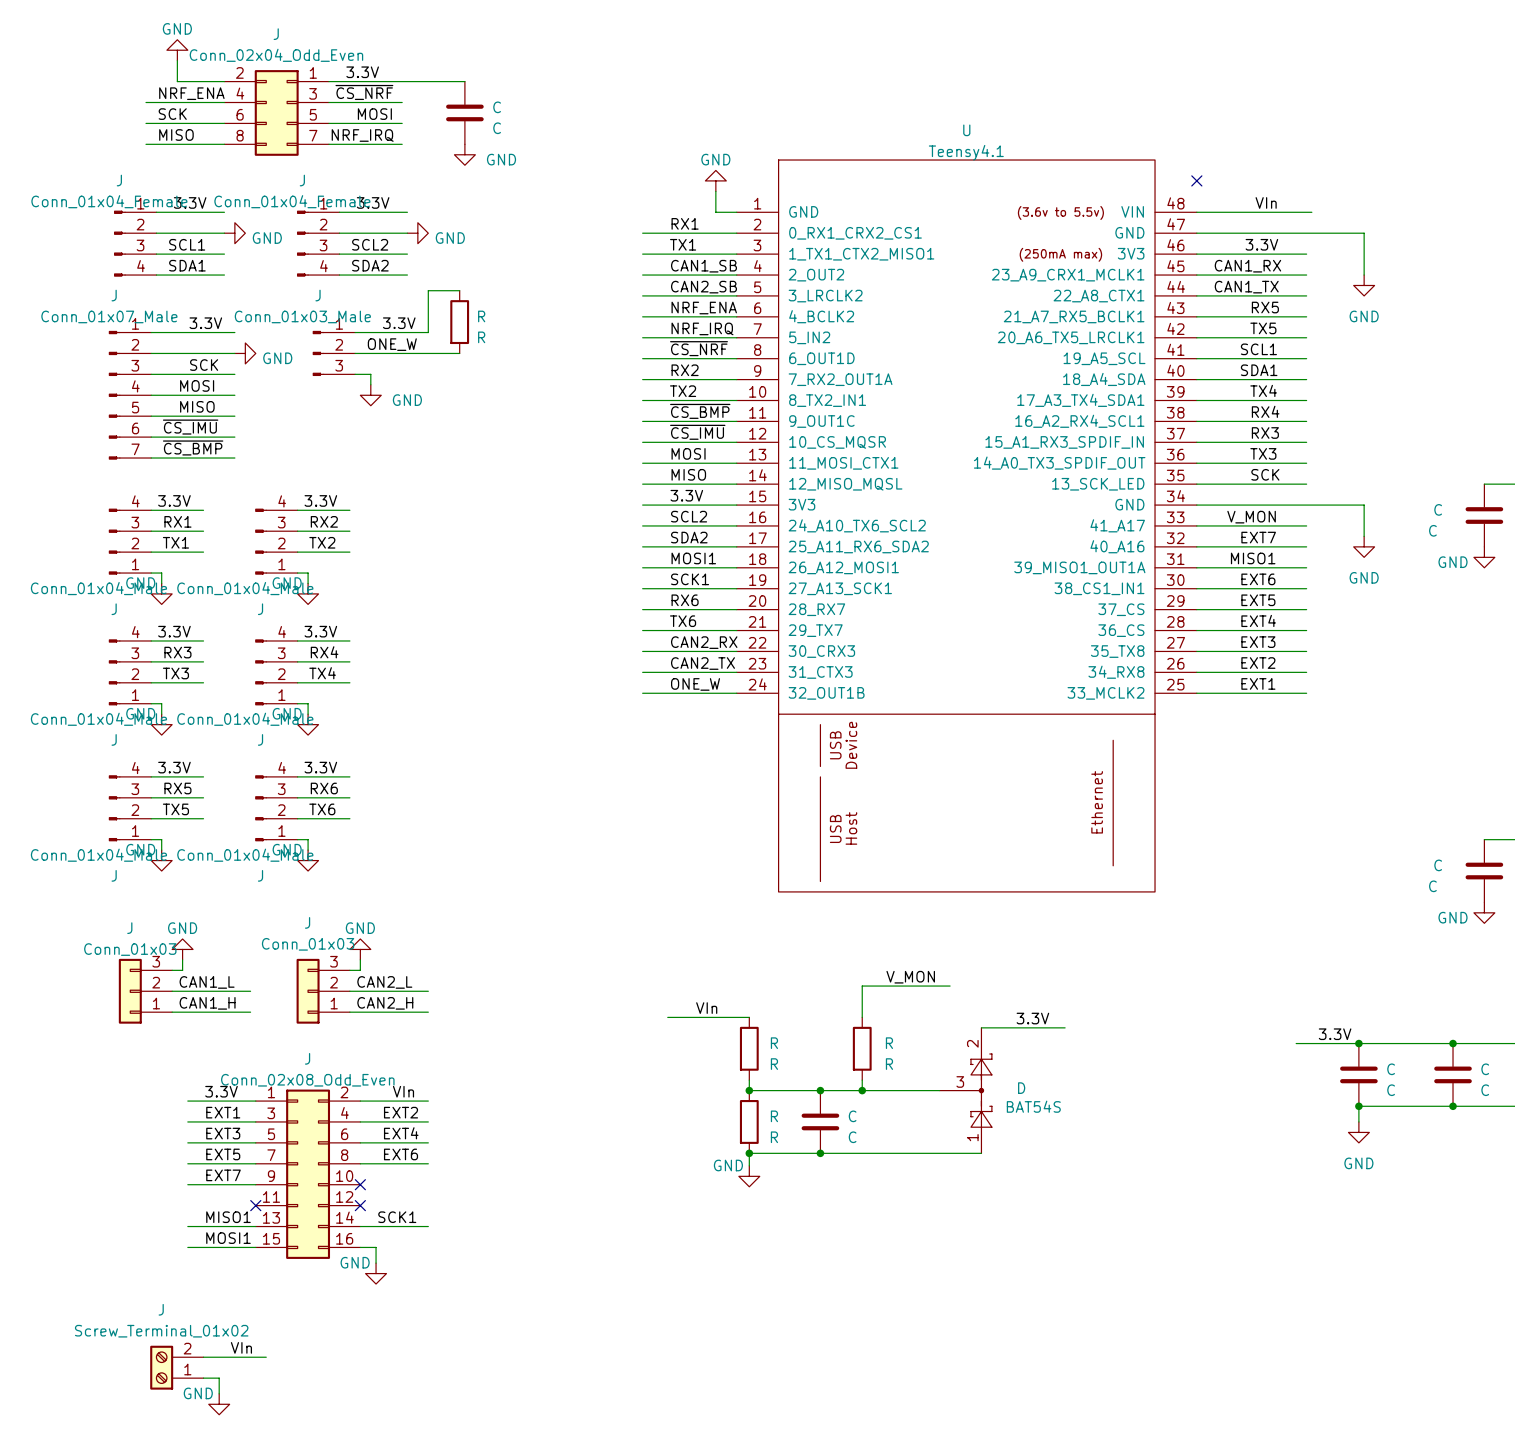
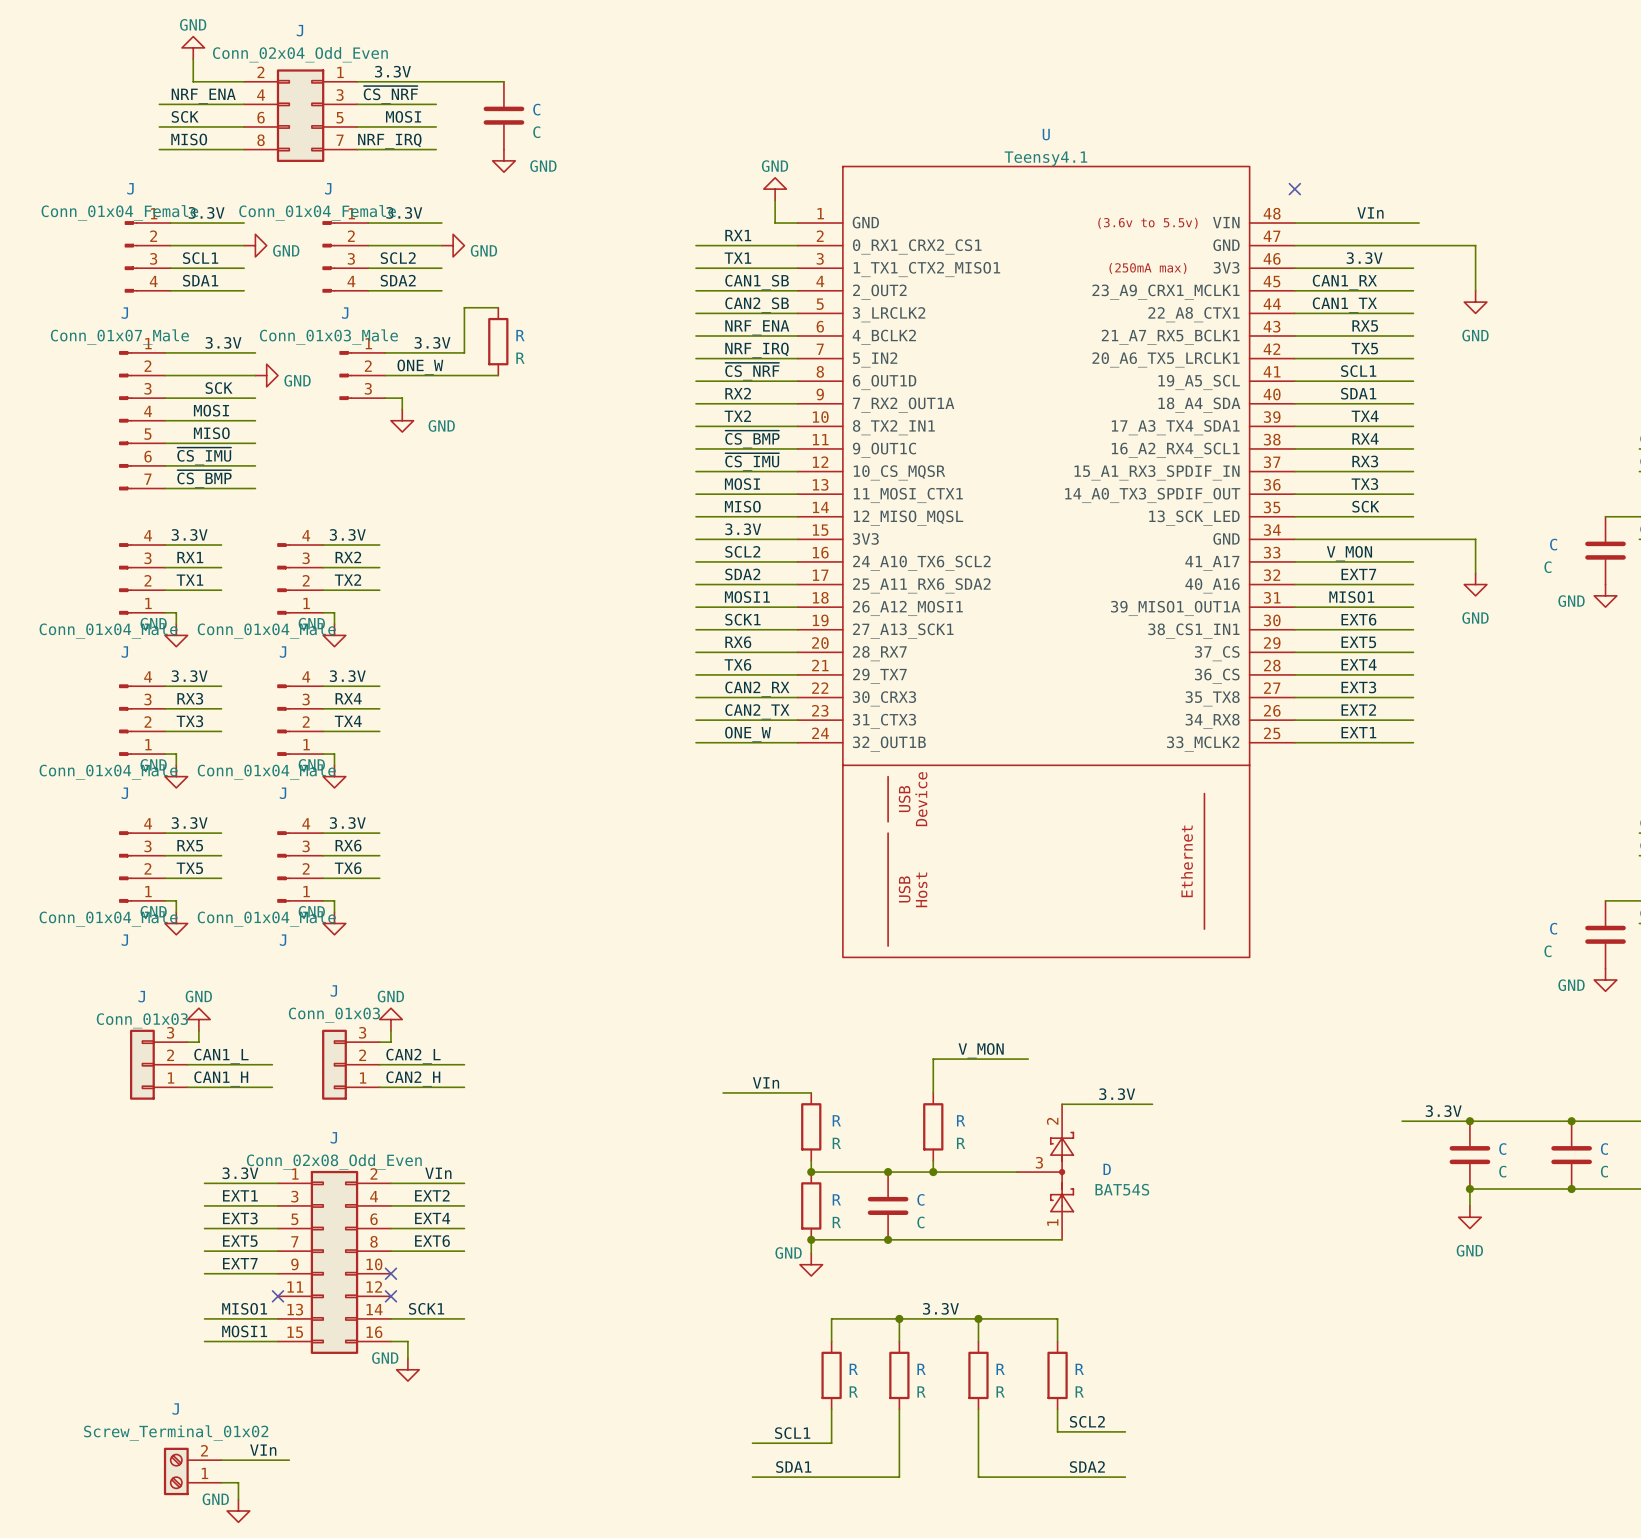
label: none -> 3.3V (940, 1308)
wire: none -> (899, 1318) (899, 1341)
junction: none -> (899, 1318)
wire: none -> (978, 1318) (978, 1341)
junction: none -> (978, 1318)
wire: none -> (831, 1341) (831, 1318) (1057, 1318) (1057, 1341)
R: none -> R (831, 1375)
R: none -> R (899, 1375)
R: none -> R (978, 1375)
R: none -> R (1057, 1375)
wire: none -> (831, 1409) (831, 1443) (752, 1443)
wire: none -> (899, 1409) (899, 1477) (752, 1477)
wire: none -> (978, 1409) (978, 1477) (1125, 1477)
wire: none -> (1057, 1409) (1057, 1431) (1125, 1431)
label: none -> SCL2 (1087, 1421)
label: none -> SCL1 (792, 1433)
label: none -> SDA1 (793, 1467)
label: none -> SDA2 (1087, 1467)

